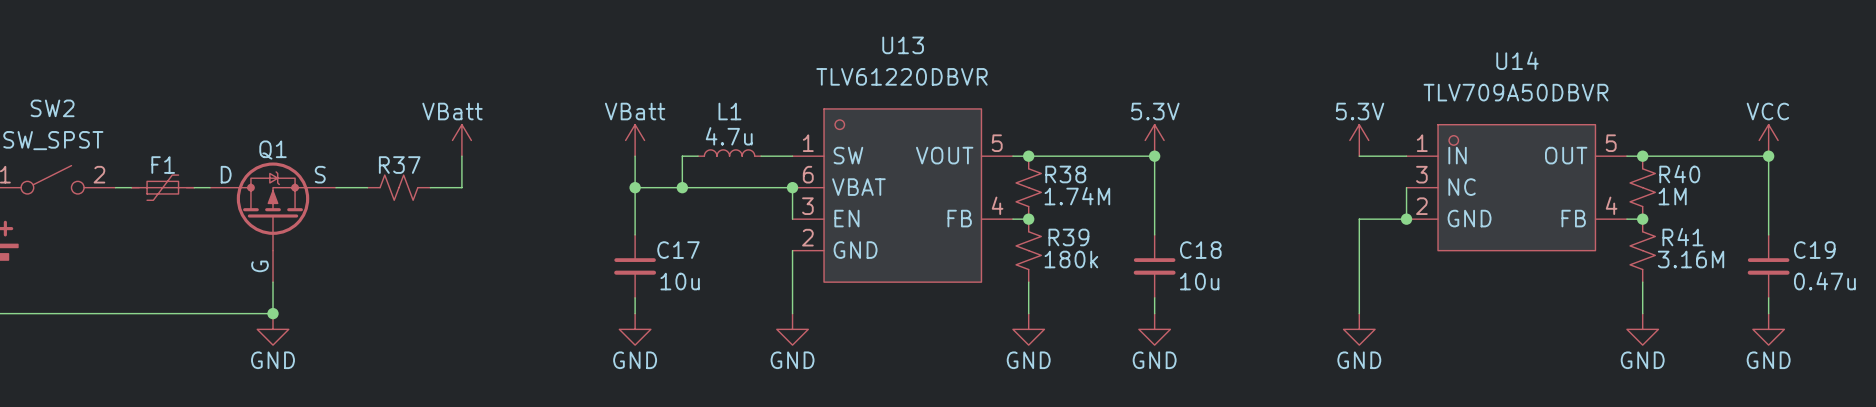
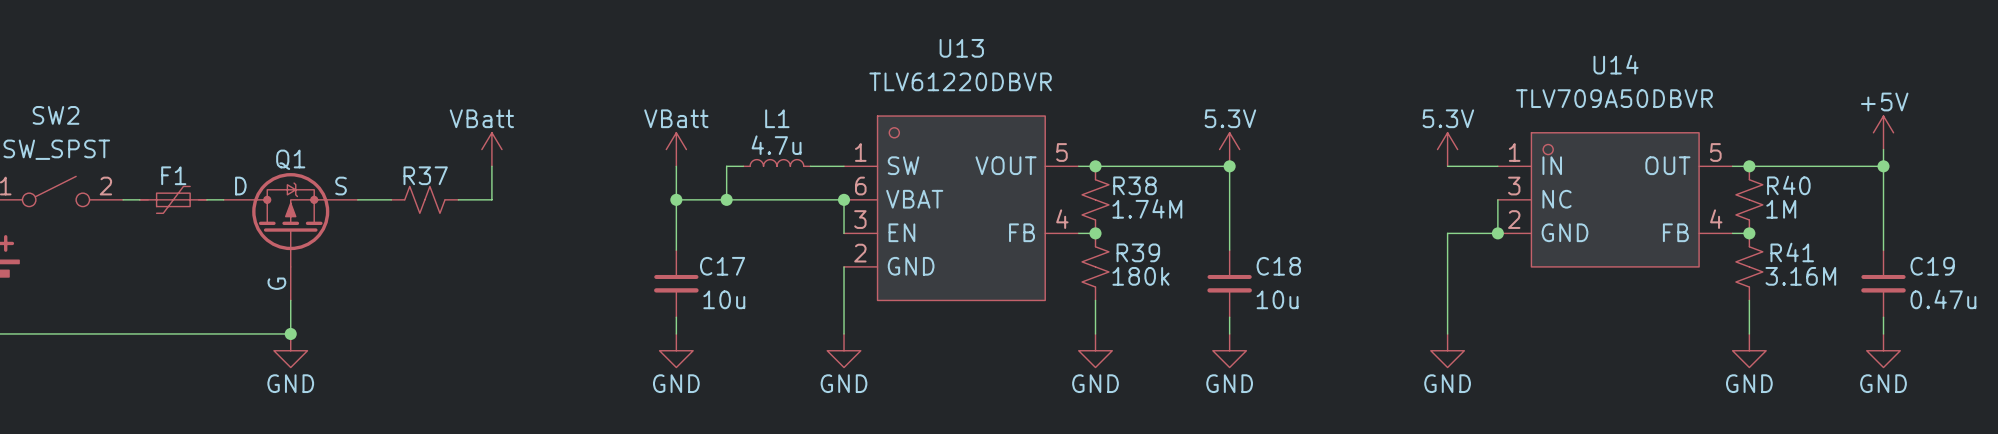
power symbol: none -> +5V (1883, 132)
power symbol: VCC (1768, 140) -> none

